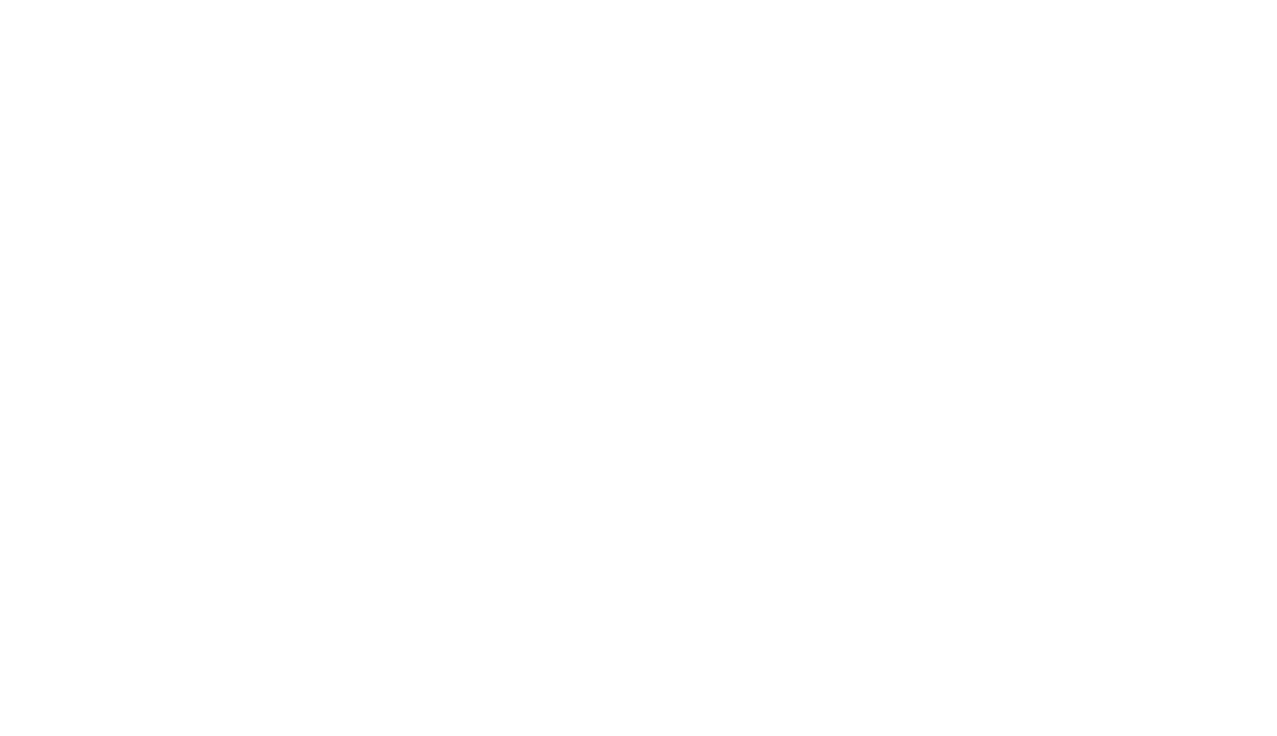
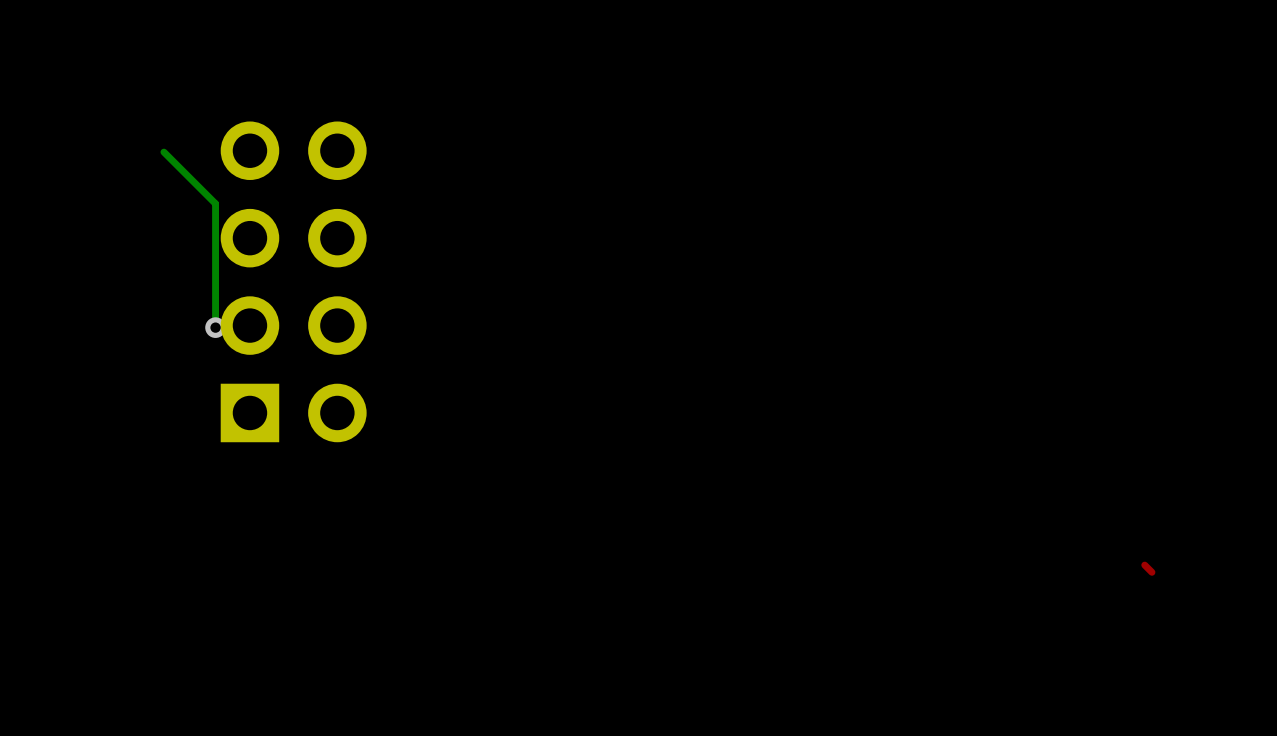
bottom track: none -> (163, 152) (215, 203) (215, 327)
part: none -> (293, 281)
via: none -> (215, 327)
top track: none -> (1144, 565) (1151, 572)

